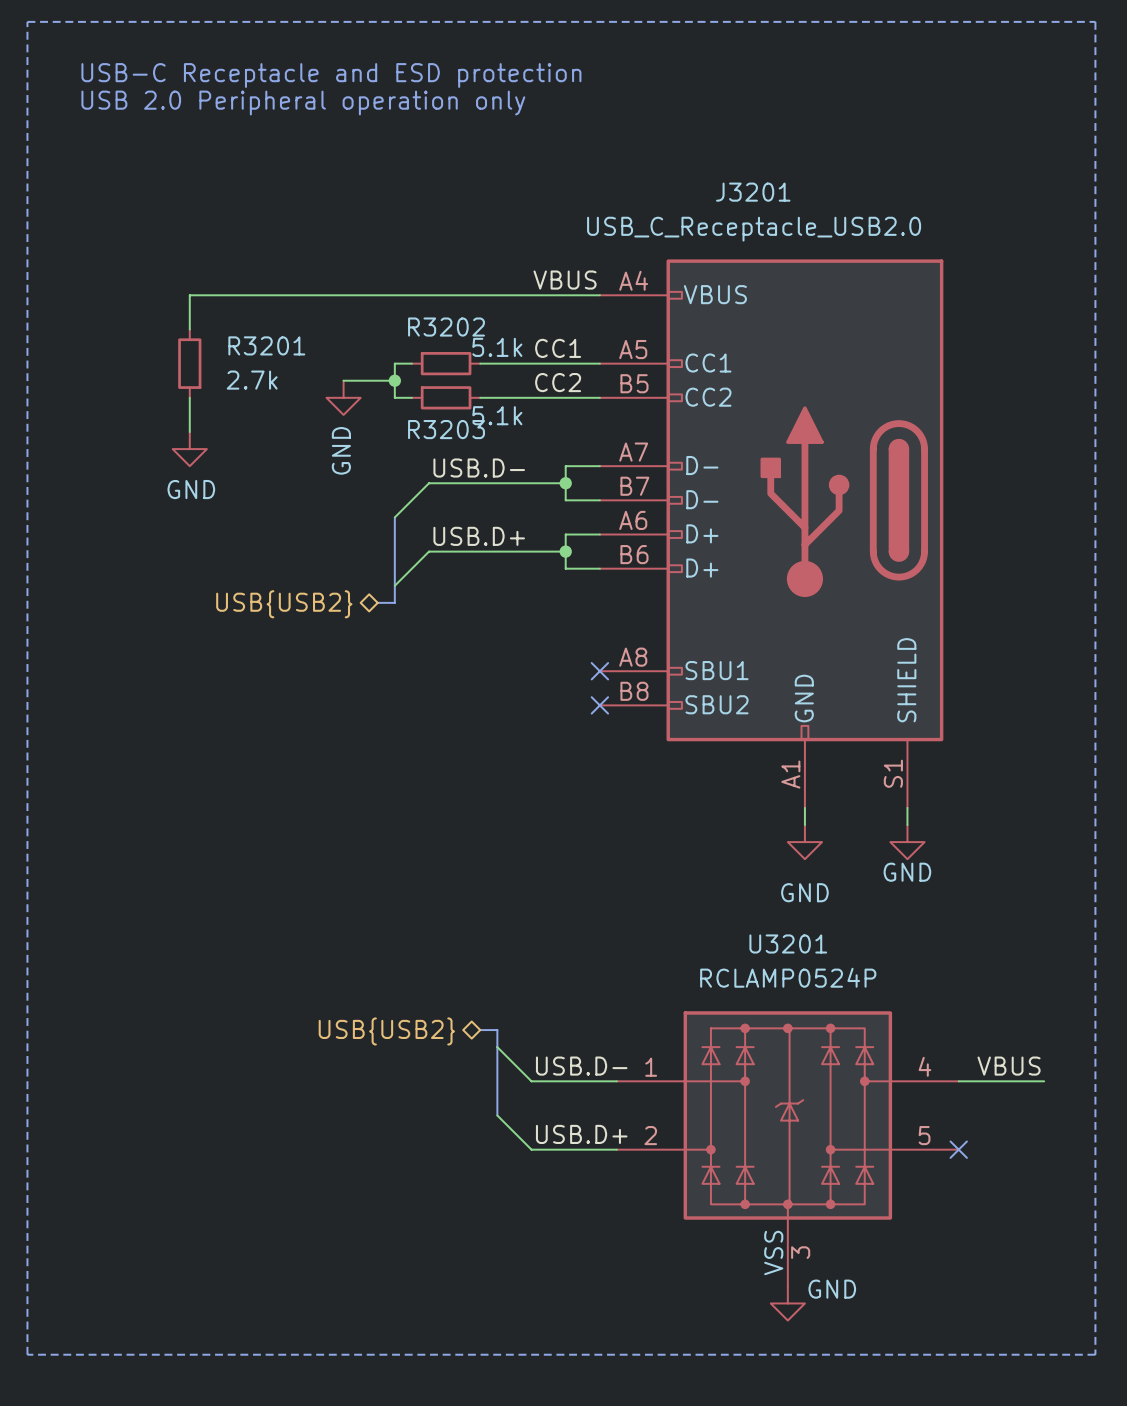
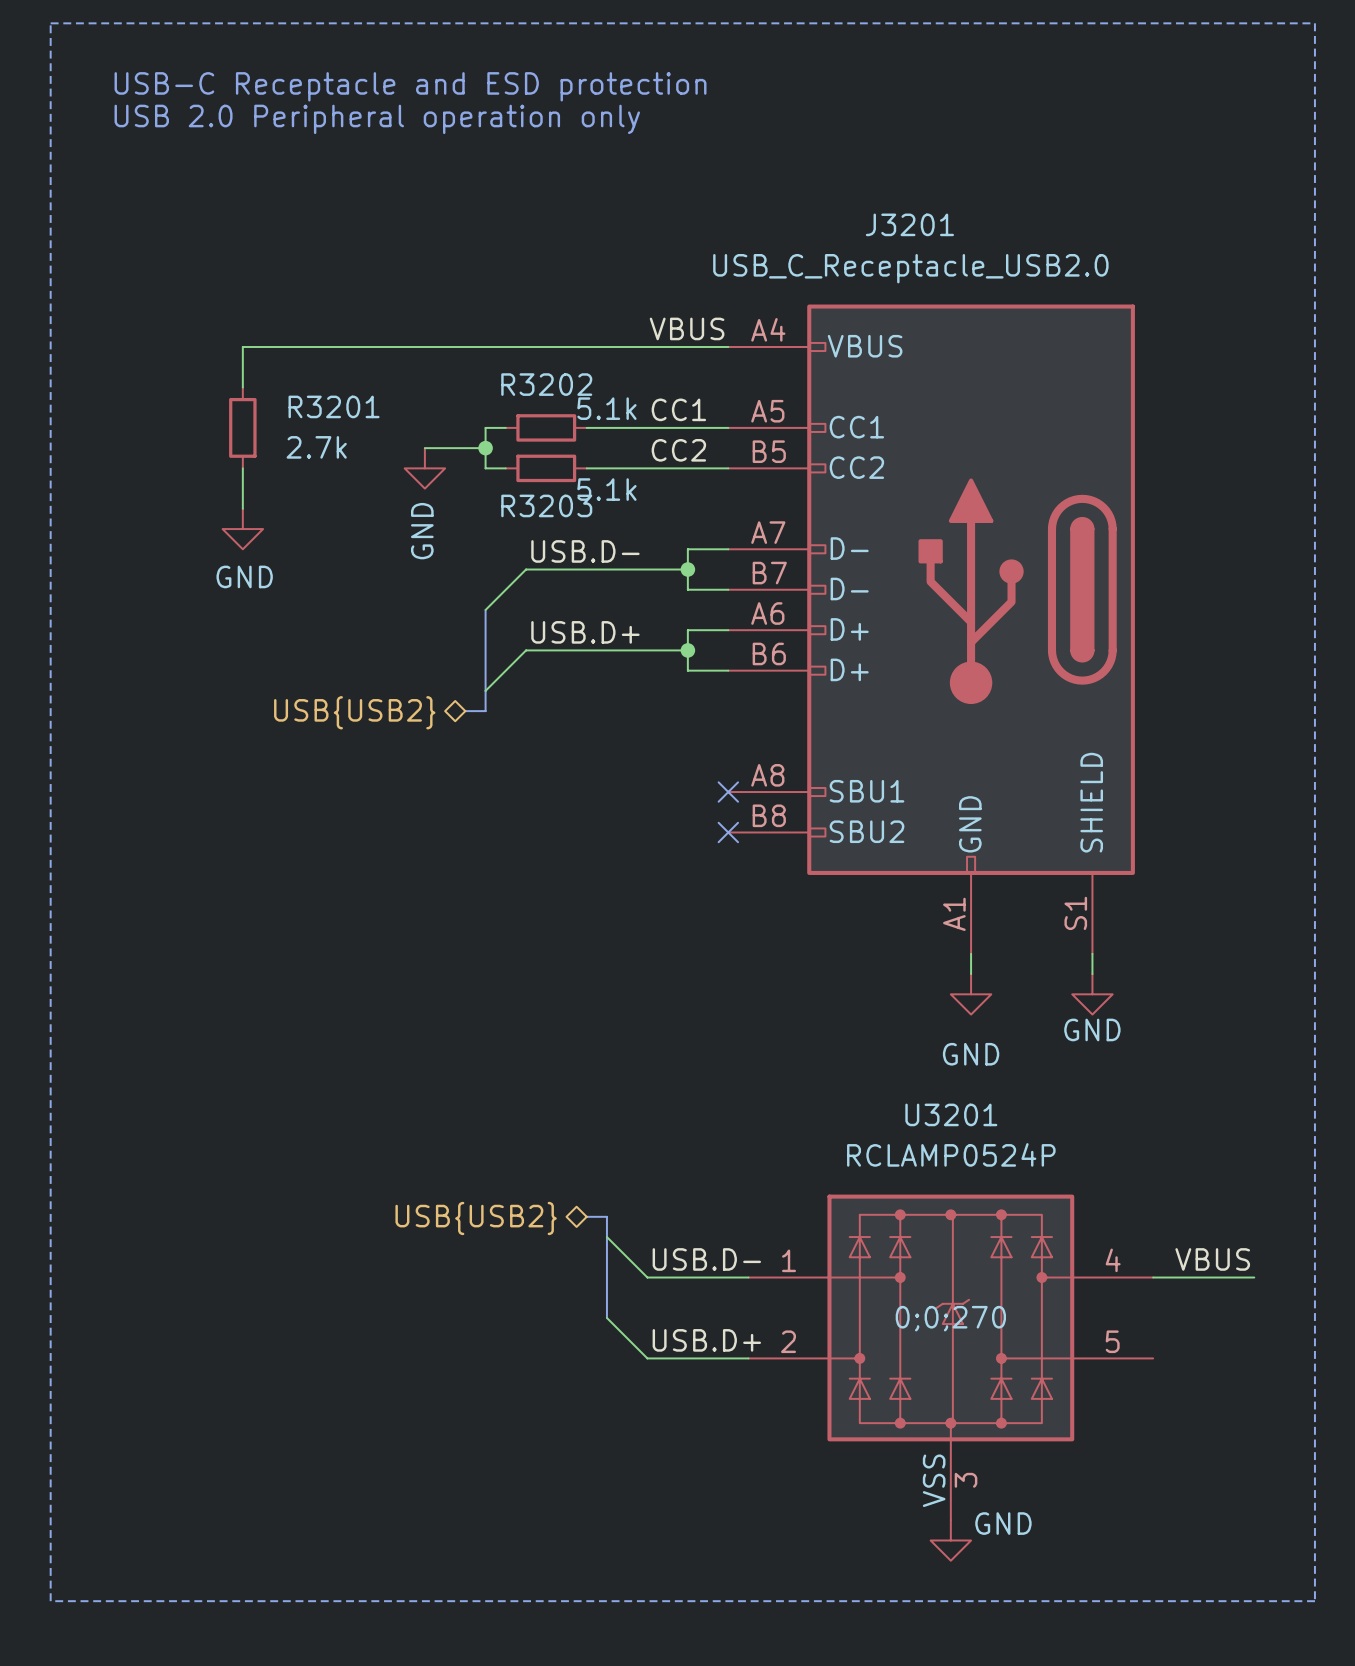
U3201 text: none -> 0;0;270 (950, 1318)
no-connect mark: (958, 1149) -> none

